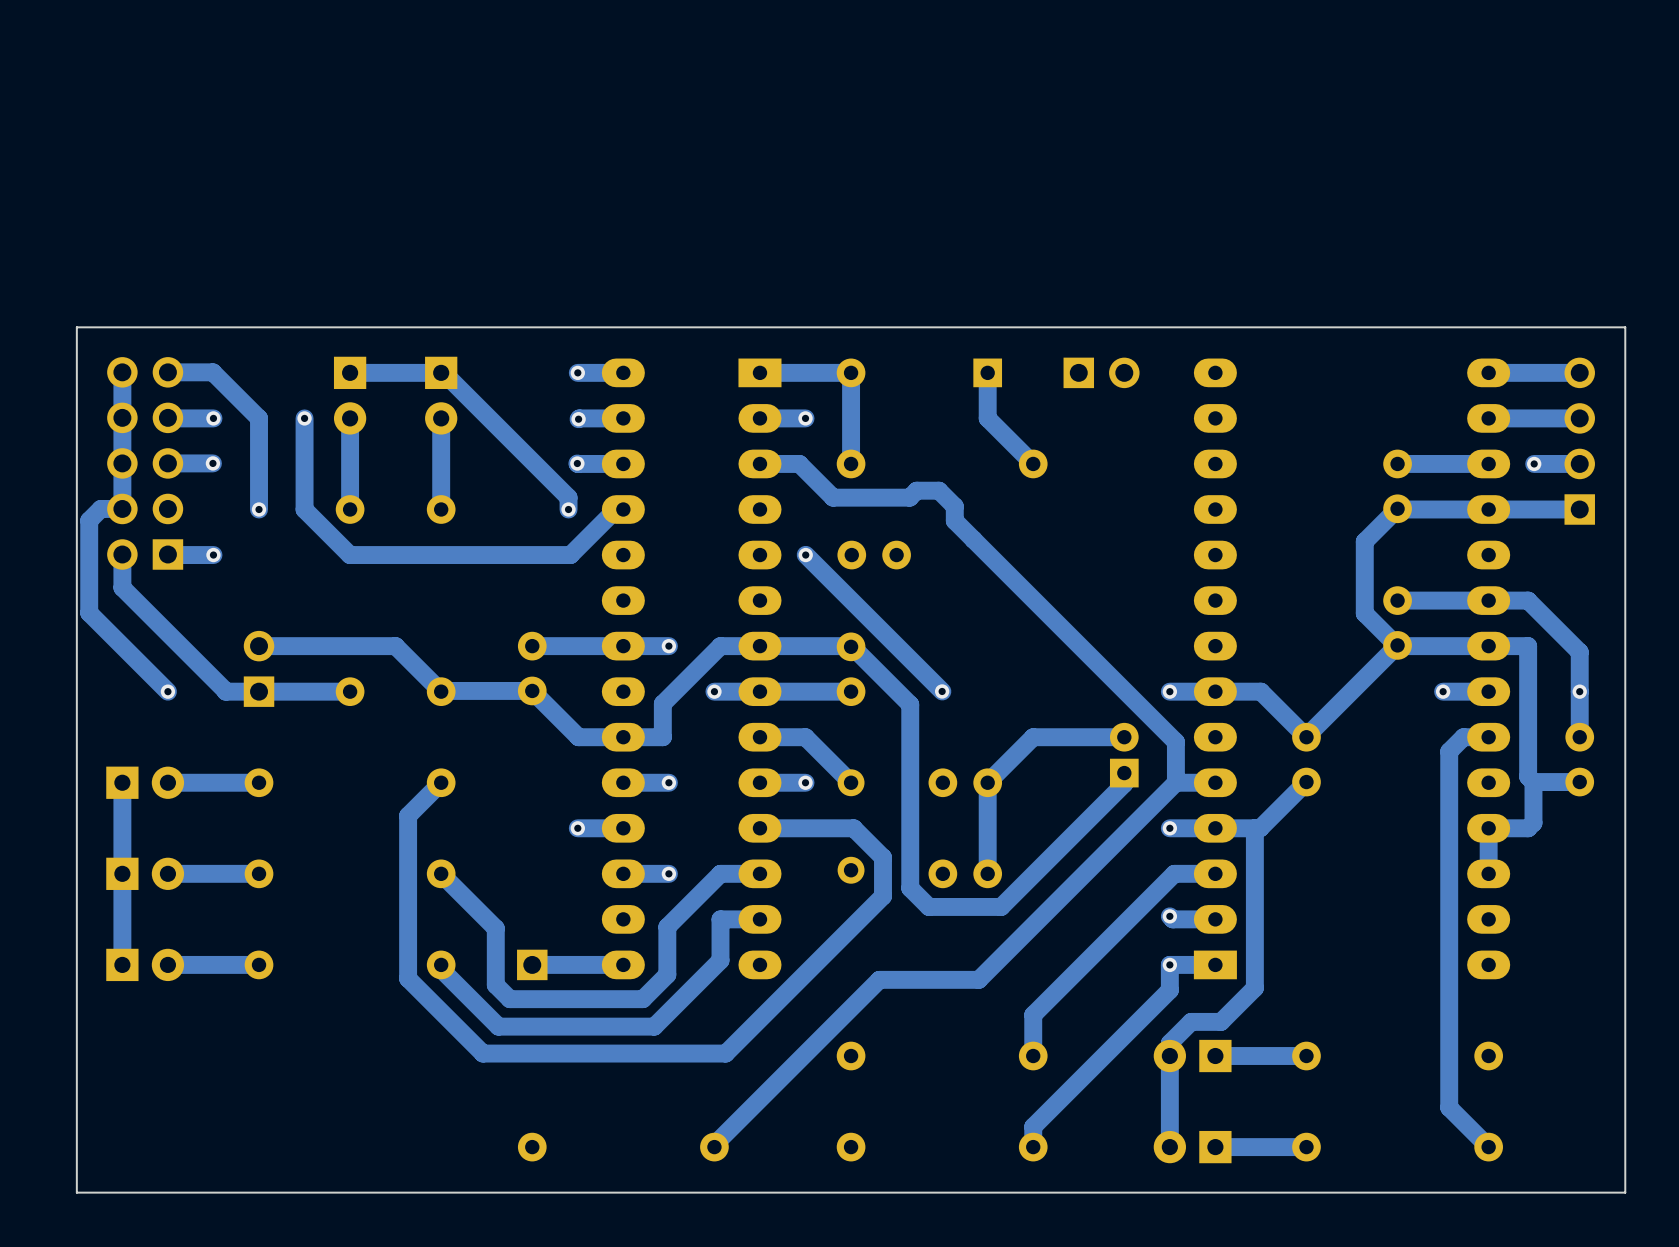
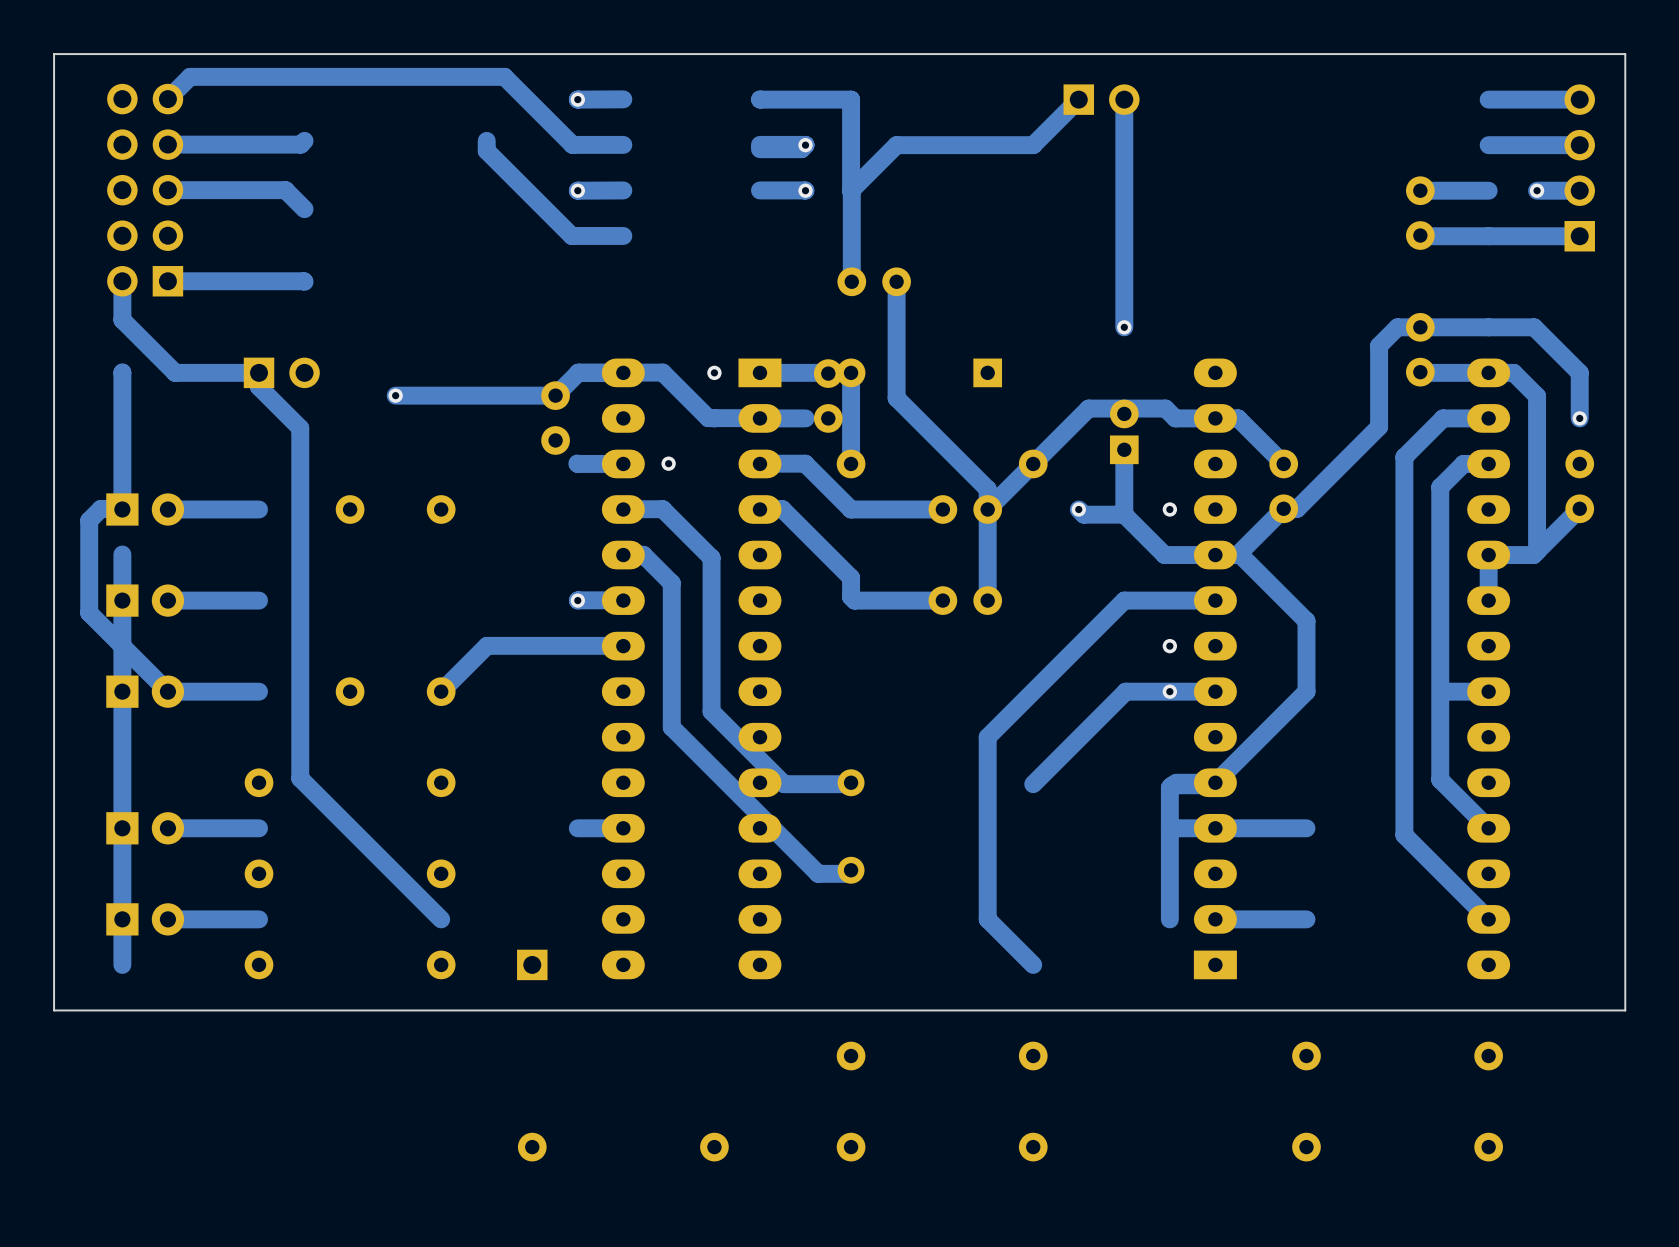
track: none -> (167, 99) (190, 76) (504, 76) (572, 144) (623, 144)
via: none -> (577, 99)
track: none -> (623, 99) (578, 99)
track: none -> (759, 99) (851, 99) (851, 190)
track: none -> (1078, 99) (1033, 145) (896, 145) (851, 190)
track: none -> (1124, 99) (1124, 327)
track: none -> (1579, 99) (1488, 99)
track: none -> (304, 140) (300, 144) (167, 144)
track: none -> (486, 140) (486, 150) (571, 235) (623, 235)
track: none -> (759, 144) (805, 145) (801, 149) (759, 149)
via: none -> (805, 145)
track: none -> (1579, 145) (1488, 145)
track: none -> (167, 190) (285, 190) (304, 209)
via: none -> (577, 190)
track: none -> (623, 190) (578, 190)
track: none -> (759, 190) (805, 190)
via: none -> (805, 190)
track: none -> (851, 190) (851, 281)
track: none -> (1488, 190) (1420, 190)
via: none -> (1537, 190)
track: none -> (1579, 190) (1537, 190)
part: none -> (1420, 213)
track: none -> (1420, 235) (1579, 236)
track: none -> (122, 281) (122, 319) (175, 372) (259, 372) (259, 386) (300, 428) (300, 778) (441, 919)
track: none -> (167, 281) (304, 281)
part: none -> (874, 281)
track: none -> (896, 281) (896, 398) (987, 489) (987, 600)
via: none -> (1124, 327)
board edge: (1625, 327) (76, 327) (76, 1192) (1625, 1192) (1625, 1010) -> (1625, 327) (1625, 54) (54, 54) (54, 1010) (1625, 1010)
part: none -> (1420, 349)
track: (167, 372) (212, 372) (259, 418) (259, 509) -> (167, 509) (259, 509)
track: (441, 372) (350, 372) -> none
track: (443, 372) (568, 497) (568, 509) -> none
via: (577, 372) -> none
via: none -> (714, 372)
track: (987, 372) (987, 418) (1033, 463) -> none
part position: (1101, 372) -> (1101, 99)
track: none -> (1487, 372) (1420, 372)
track: (1579, 372) (1513, 372) -> (1537, 551) (1537, 396) (1513, 372)
part: (350, 395) -> none
track: none -> (395, 395) (555, 395) (578, 372) (662, 372) (708, 418) (759, 418)
via: none -> (395, 395)
part: (441, 395) -> none
part: none -> (828, 396)
track: (213, 418) (168, 418) -> none
via: (213, 418) -> none
track: (304, 418) (304, 509) (350, 555) (570, 555) (616, 509) -> none
via: (304, 418) -> none
track: (350, 418) (350, 509) -> none
track: (441, 418) (441, 509) -> none
part: none -> (555, 418)
track: (623, 418) (578, 419) -> none
via: (805, 418) -> none
track: none -> (1488, 418) (1443, 418) (1404, 457) (1404, 835) (1488, 919)
track: (1579, 418) (1488, 418) -> (1579, 418) (1579, 372) (1534, 327) (1397, 327) (1379, 345) (1379, 426) (1297, 508) (1283, 508) (1237, 555)
via: (578, 419) -> none
part position: (1579, 441) -> (1579, 167)
track: none -> (1124, 455) (1124, 514)
part position: (145, 463) -> (145, 190)
track: (212, 463) (167, 463) -> none
via: (212, 463) -> none
via: (577, 463) -> none
via: none -> (668, 463)
track: (759, 463) (799, 463) (833, 497) (909, 497) (916, 490) (939, 490) (954, 506) (954, 520) (1175, 742) (1175, 782) (978, 979) (879, 979) (714, 1144) -> (759, 463) (805, 463) (851, 509) (942, 509)
track: none -> (1283, 463) (1238, 418) (1175, 418) (1165, 408) (1088, 408) (987, 509)
track: (1463, 463) (1397, 463) -> (1463, 463) (1440, 487) (1440, 779) (1488, 828)
via position: (1534, 463) -> (1579, 418)
track: (1579, 463) (1534, 463) -> none
part: none -> (1283, 486)
part: (1397, 486) -> none
part: none -> (1579, 486)
track: (1397, 508) (1364, 541) (1364, 613) (1396, 645) -> none
track: none -> (1579, 508) (1533, 555) (1488, 555) (1488, 600)
part: none -> (145, 509)
via: (259, 509) -> none
via: (568, 509) -> none
track: none -> (623, 509) (662, 509) (711, 558) (711, 711) (784, 784) (851, 784)
track: none -> (759, 509) (782, 509) (851, 577) (851, 597) (854, 600) (942, 600)
part: none -> (965, 509)
track: none -> (1078, 509) (1083, 514) (1124, 514)
via: none -> (1078, 509)
via: none -> (1169, 509)
track: (1579, 509) (1398, 509) -> none
track: none -> (1124, 514) (1164, 555) (1240, 555) (1306, 621) (1306, 691) (1212, 785) (1172, 785) (1169, 787) (1169, 919)
track: none -> (623, 554) (643, 554) (671, 583) (671, 727) (818, 873) (851, 873)
track: (805, 554) (942, 691) -> none
track: (213, 555) (168, 555) -> none
via: (213, 555) -> none
via: (805, 555) -> none
part: (874, 555) -> none
track: (122, 587) (225, 691) -> (167, 691) (225, 691)
track: none -> (122, 587) (122, 782)
part: none -> (145, 600)
via: none -> (577, 600)
track: none -> (623, 600) (577, 600)
part: none -> (965, 600)
track: (1397, 600) (1528, 600) (1579, 652) (1579, 737) -> none
part: (1397, 622) -> none
track: (1397, 645) (1306, 736) (1260, 691) (1215, 691) -> none
track: (259, 646) (395, 646) (441, 691) -> (623, 645) (487, 645) (441, 691)
track: (668, 646) (532, 646) -> none
via: (668, 646) -> none
track: (850, 646) (720, 646) (662, 703) (662, 737) (578, 737) (532, 690) (441, 690) -> none
track: (852, 646) (910, 704) (910, 888) (928, 906) (1001, 906) (1124, 783) (1124, 773) -> none
via: none -> (1169, 646)
track: (1398, 646) (1528, 646) (1528, 776) (1533, 782) -> none
part rotation: 0° (259, 668) -> 90° clockwise (281, 372)
part position: (259, 668) -> (281, 372)
part: (532, 668) -> none
part: (851, 669) -> none
part: none -> (145, 691)
via: (167, 691) -> none
track: (350, 691) (259, 691) -> none
via: (714, 691) -> none
track: (851, 691) (714, 691) -> none
via: (942, 691) -> none
track: none -> (1169, 691) (1125, 691) (1033, 784)
via: (1443, 691) -> none
via: (1579, 691) -> none
track: (759, 737) (805, 737) (851, 782) -> none
track: (1124, 737) (1033, 737) (987, 782) -> (1215, 600) (1124, 600) (987, 737) (987, 782)
track: (1488, 737) (1463, 737) (1449, 751) (1449, 1107) (1488, 1147) -> none
part position: (1124, 755) -> (1124, 431)
part: (1306, 759) -> none
part: (1579, 759) -> none
part: (145, 782) -> none
track: (259, 782) (167, 782) -> (259, 828) (167, 828)
track: (441, 782) (408, 815) (408, 978) (483, 1053) (725, 1053) (883, 896) (883, 857) (853, 828) (759, 828) -> none
track: (668, 782) (623, 782) -> none
via: (668, 782) -> none
track: (805, 782) (759, 782) -> none
via: (805, 782) -> none
part: (965, 782) -> none
track: (1306, 782) (1260, 828) -> (1306, 828) (1260, 828)
track: (1533, 782) (1533, 822) (1528, 828) (1488, 828) (1488, 873) -> none
track: (1579, 782) (1533, 782) -> none
part: none -> (145, 828)
via: (577, 828) -> none
via: (1169, 828) -> none
track: (1254, 828) (1254, 988) (1221, 1021) (1191, 1021) (1169, 1043) (1169, 1147) -> none
part: (145, 873) -> none
track: (259, 873) (167, 873) -> (259, 600) (167, 600)
track: (668, 873) (623, 873) -> none
via: (668, 873) -> none
track: (759, 873) (720, 873) (667, 927) (667, 974) (642, 999) (509, 999) (495, 985) (495, 928) (441, 873) -> none
part: (965, 873) -> none
track: none -> (987, 873) (987, 919) (1033, 964)
track: (1215, 873) (1174, 873) (1033, 1014) (1033, 1056) -> none
track: (1169, 916) (1172, 919) (1215, 919) -> (1306, 919) (1215, 919)
via: (1169, 916) -> none
part: none -> (145, 919)
track: (759, 919) (720, 919) (720, 960) (654, 1026) (498, 1026) (441, 969) -> none
part: (145, 964) -> none
track: (259, 964) (167, 964) -> (259, 919) (167, 919)
track: (623, 964) (532, 964) -> none
via: (1169, 964) -> none
track: (1215, 964) (1169, 964) (1169, 990) (1033, 1126) (1033, 1147) -> none
part: (1192, 1056) -> none
track: (1306, 1056) (1215, 1056) -> none
part: (1192, 1147) -> none
track: (1306, 1147) (1215, 1147) -> none

